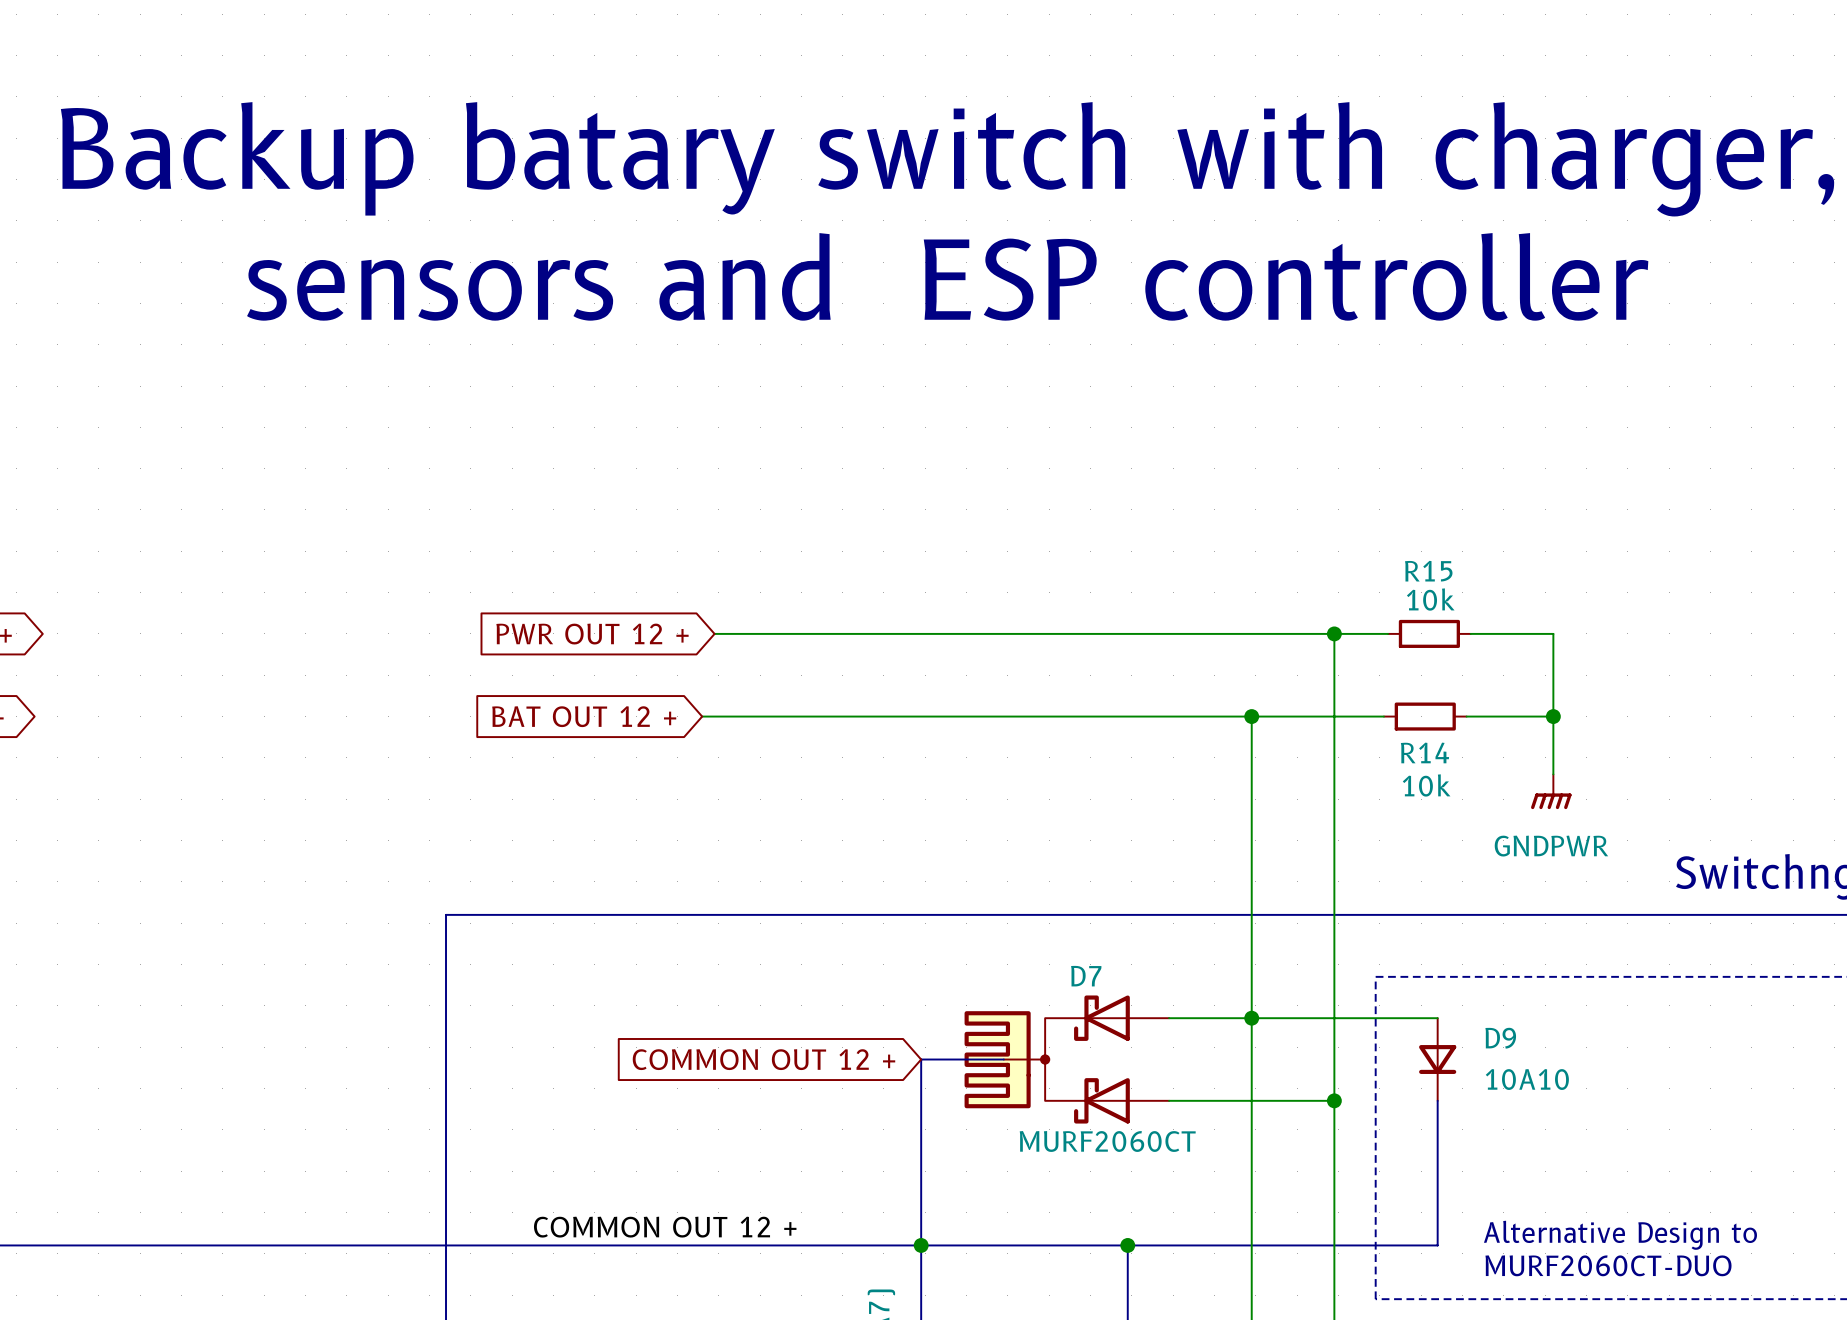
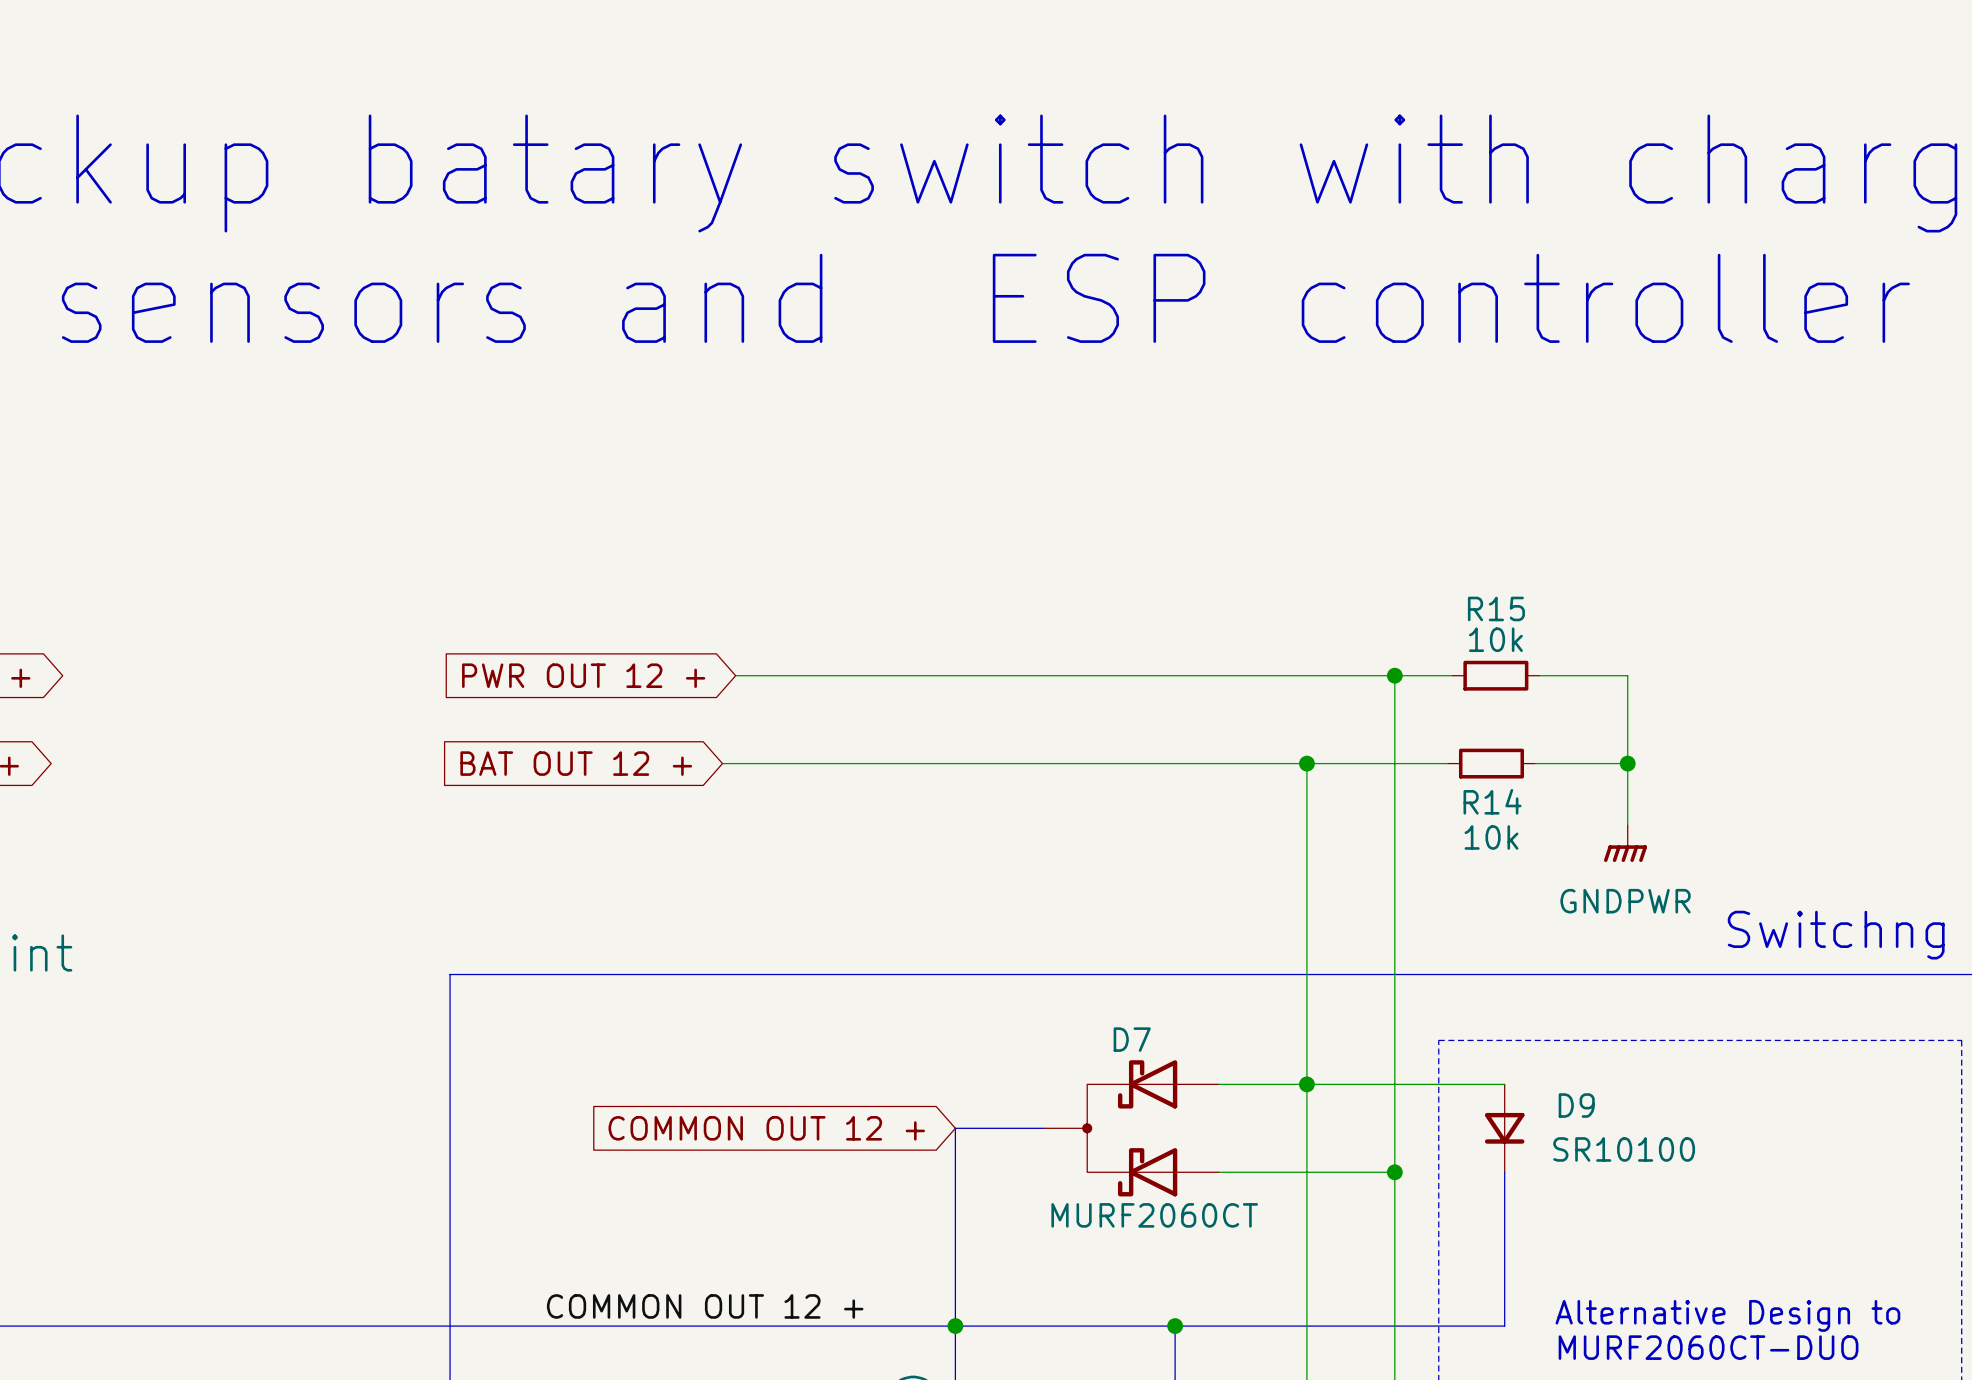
part: (997, 1059) -> none
D9 value: 10A10 (1527, 1079) -> SR10100 (1624, 1149)

